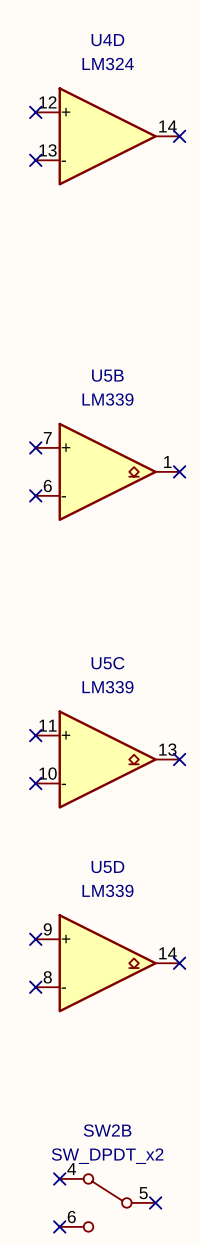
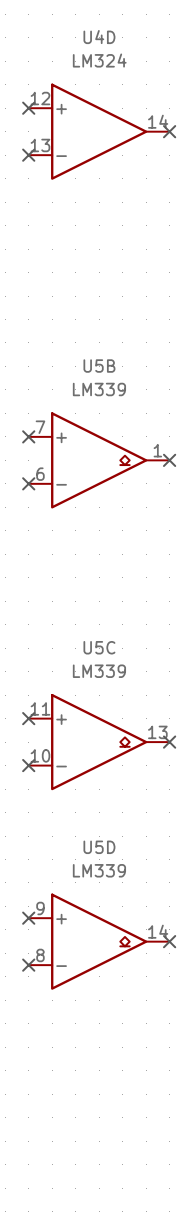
no-connect mark: (59, 1178) -> none
SW2B: SW_DPDT_x2 (107, 1202) -> none
no-connect mark: (155, 1202) -> none
no-connect mark: (59, 1226) -> none

